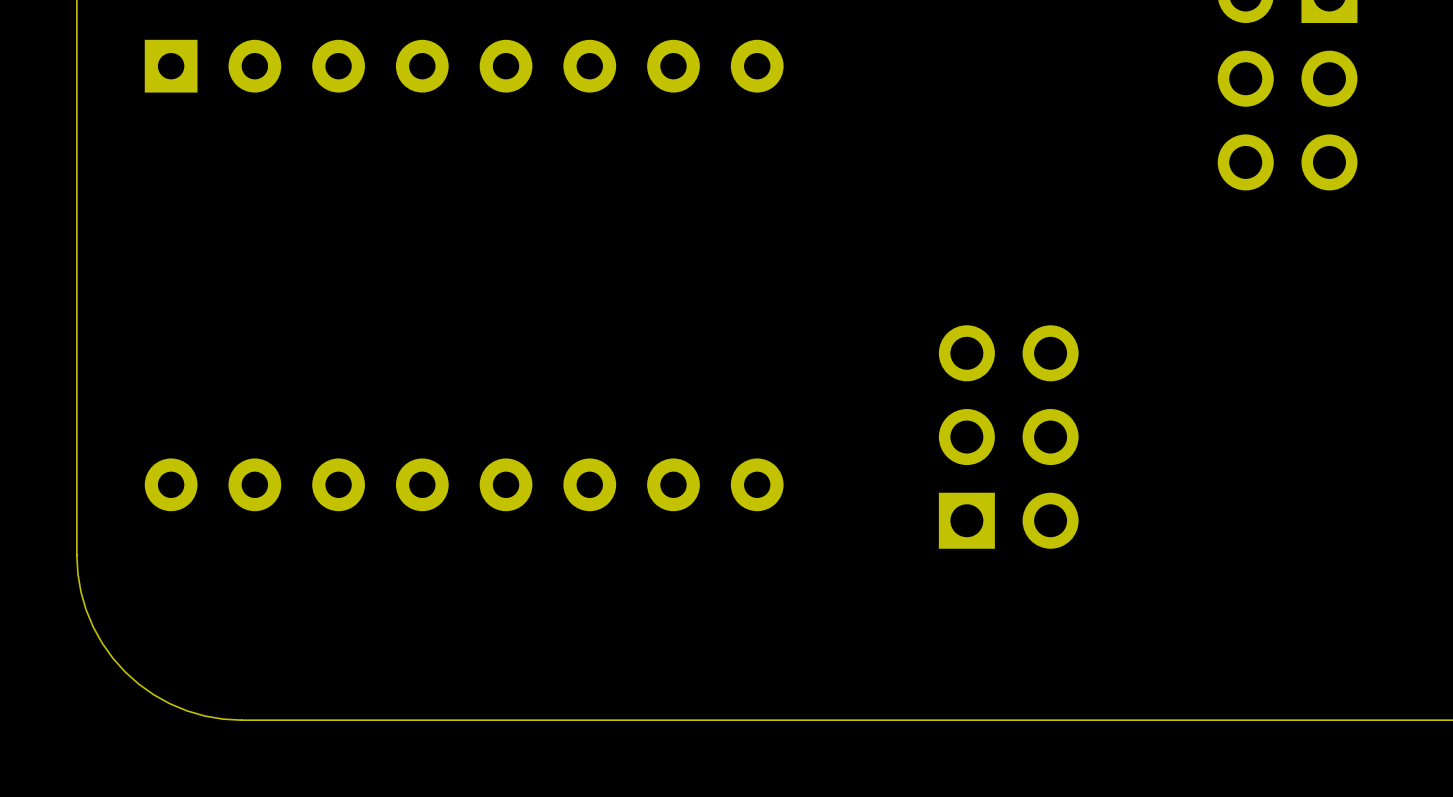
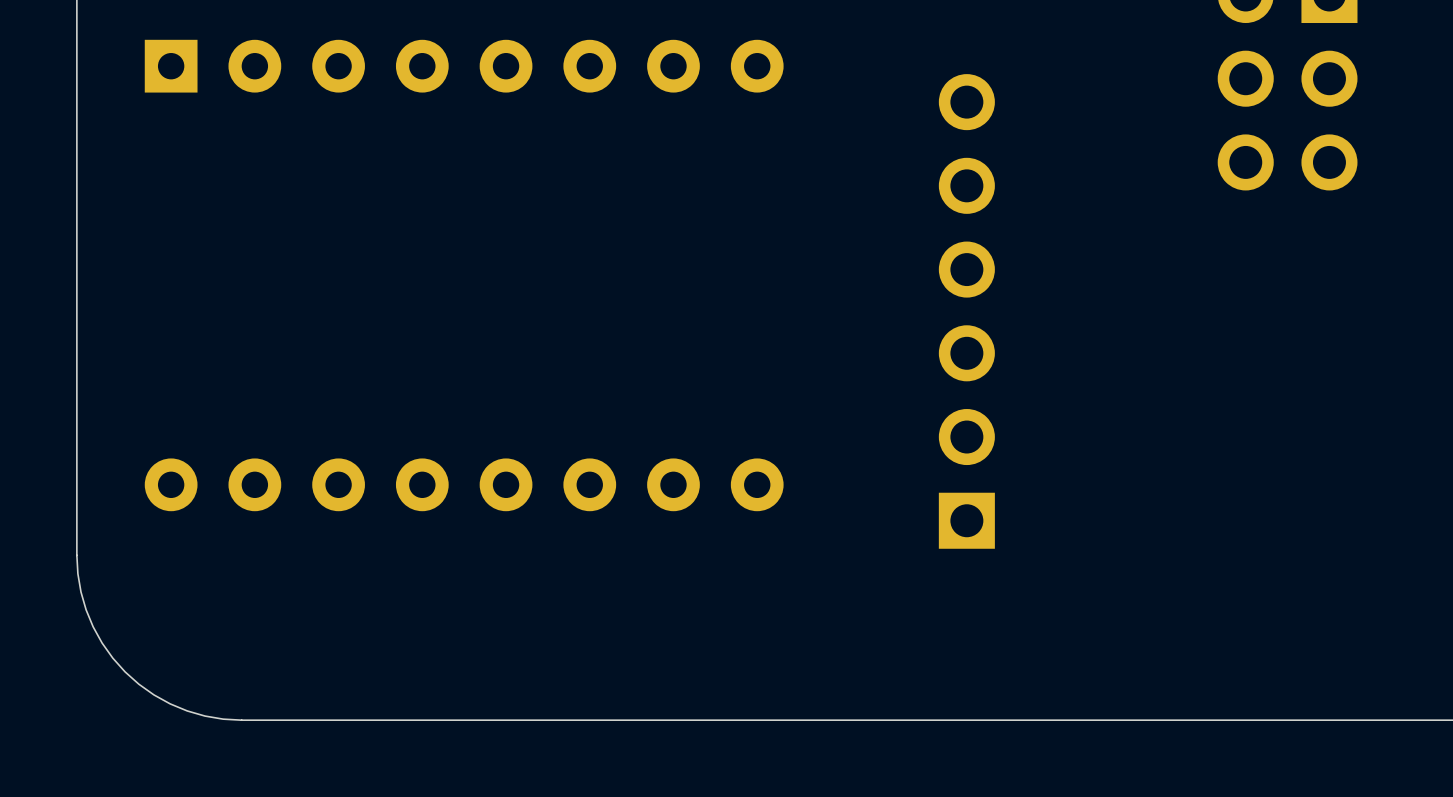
part: none -> (966, 311)
part: (1008, 437) -> none

